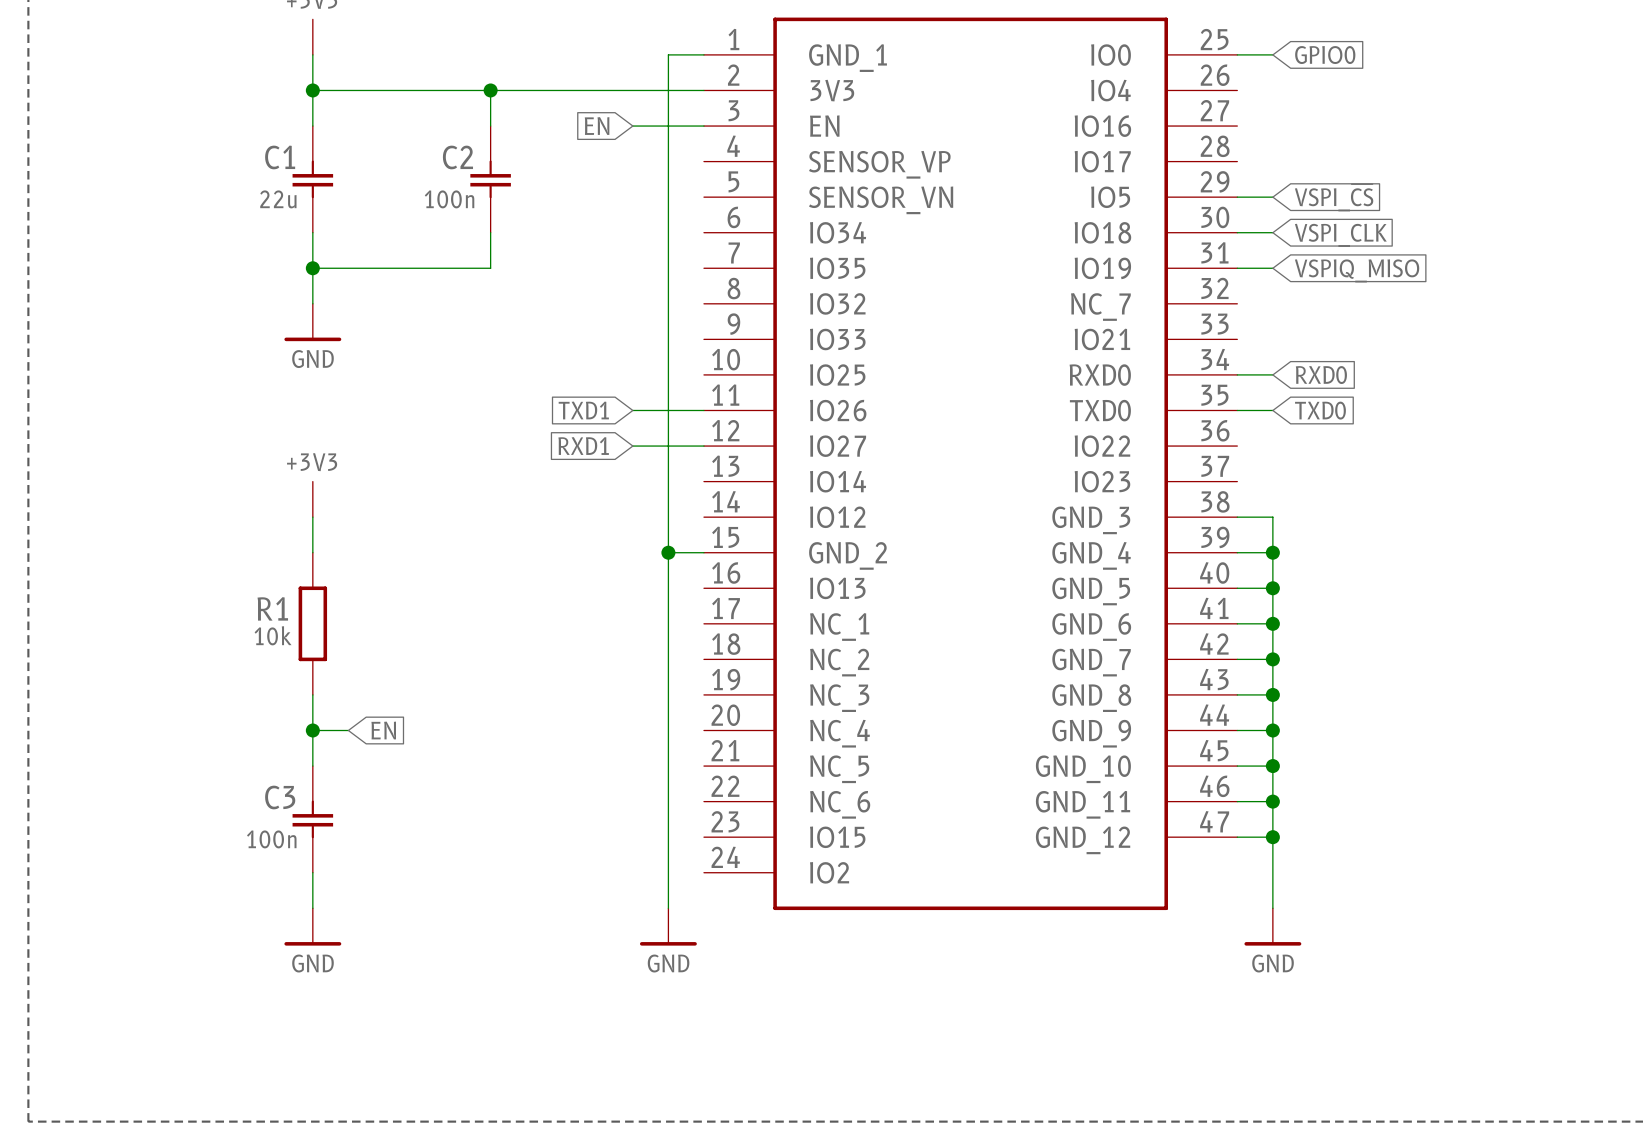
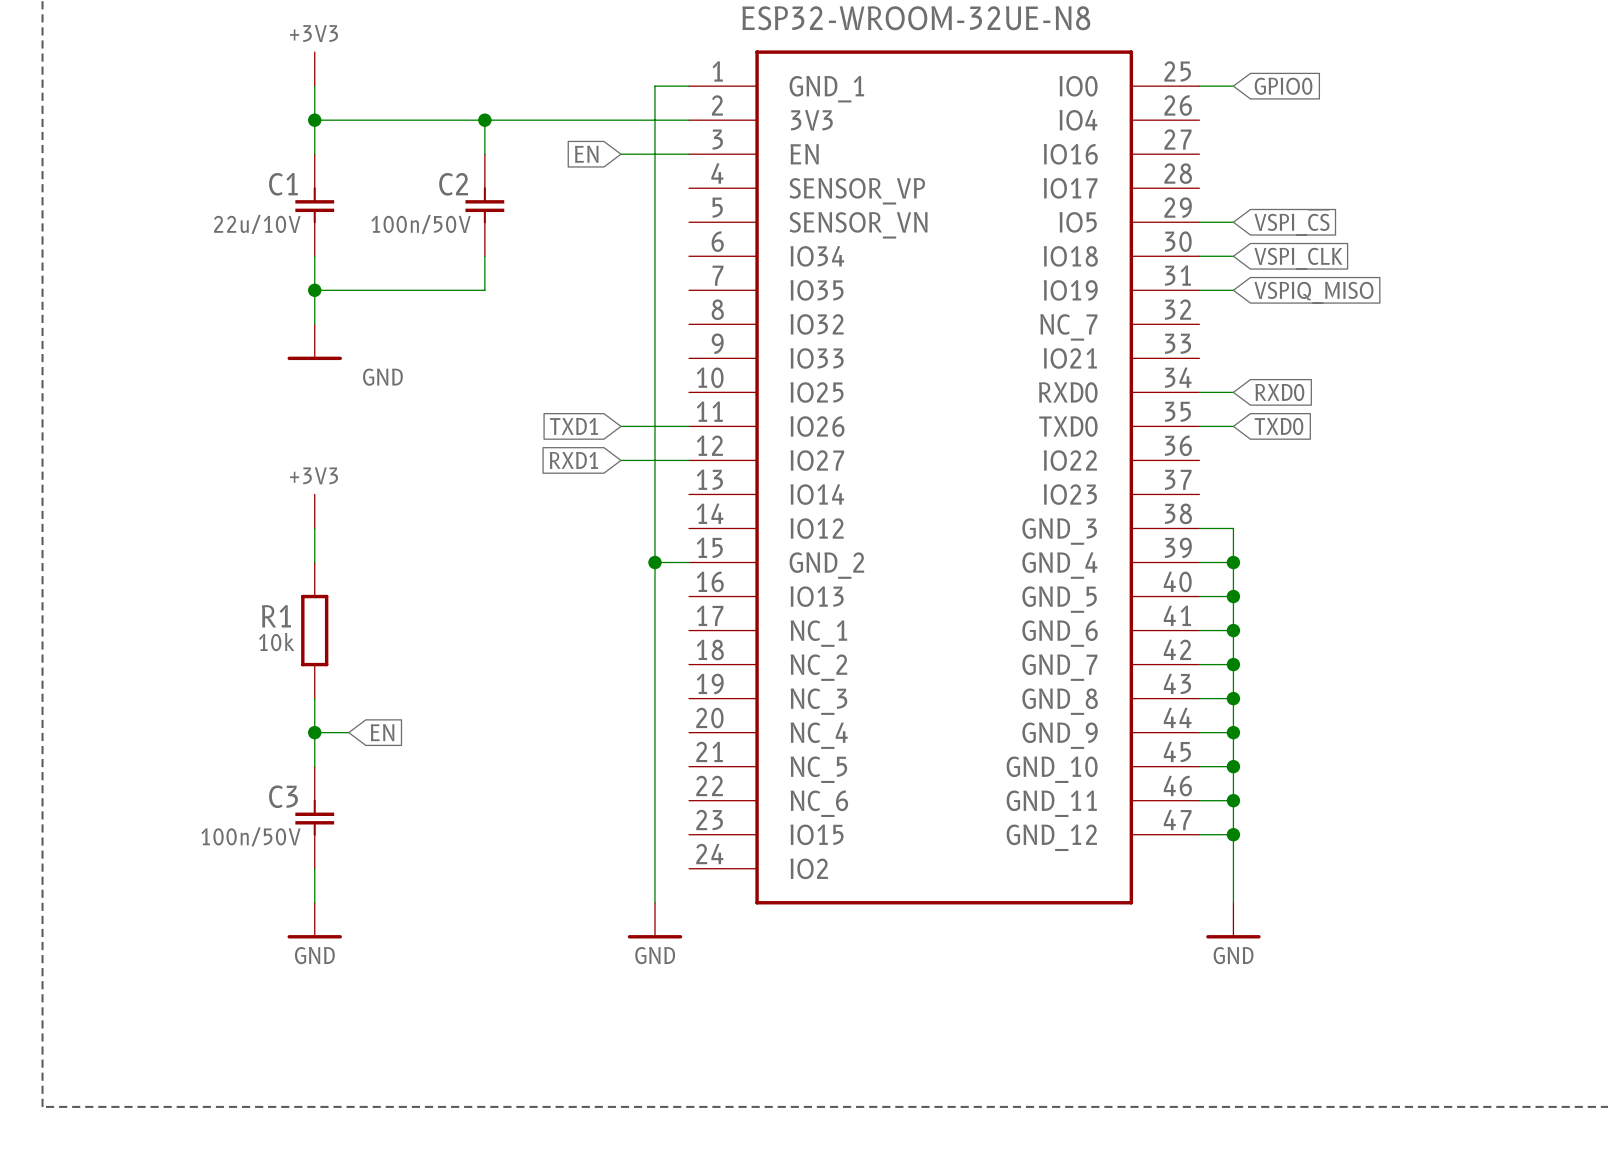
C1 value: 22u (278, 199) -> 22u/10V (257, 224)
C2 value: 100n (449, 199) -> 100n/50V (421, 224)
power symbol text position: GND (312, 359) -> GND (382, 377)
C3 value: 100n (271, 839) -> 100n/50V (250, 836)

